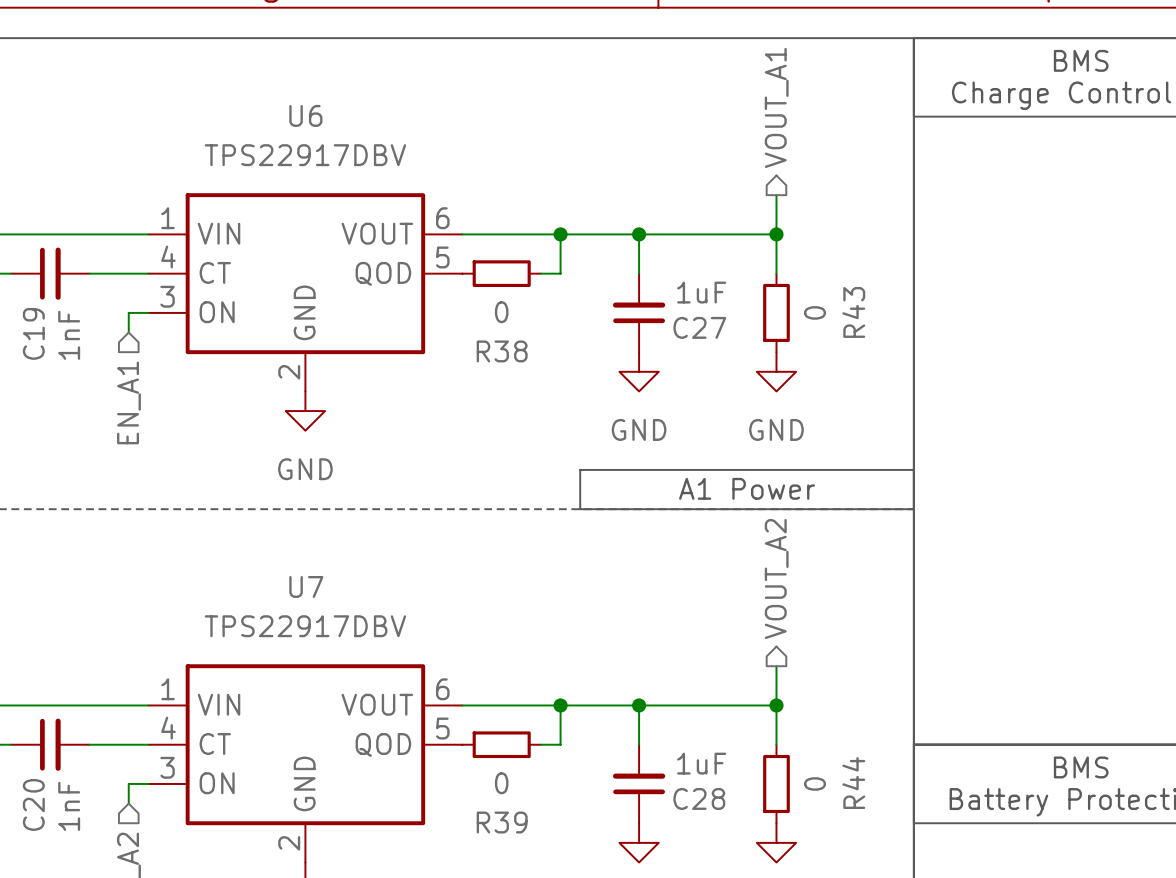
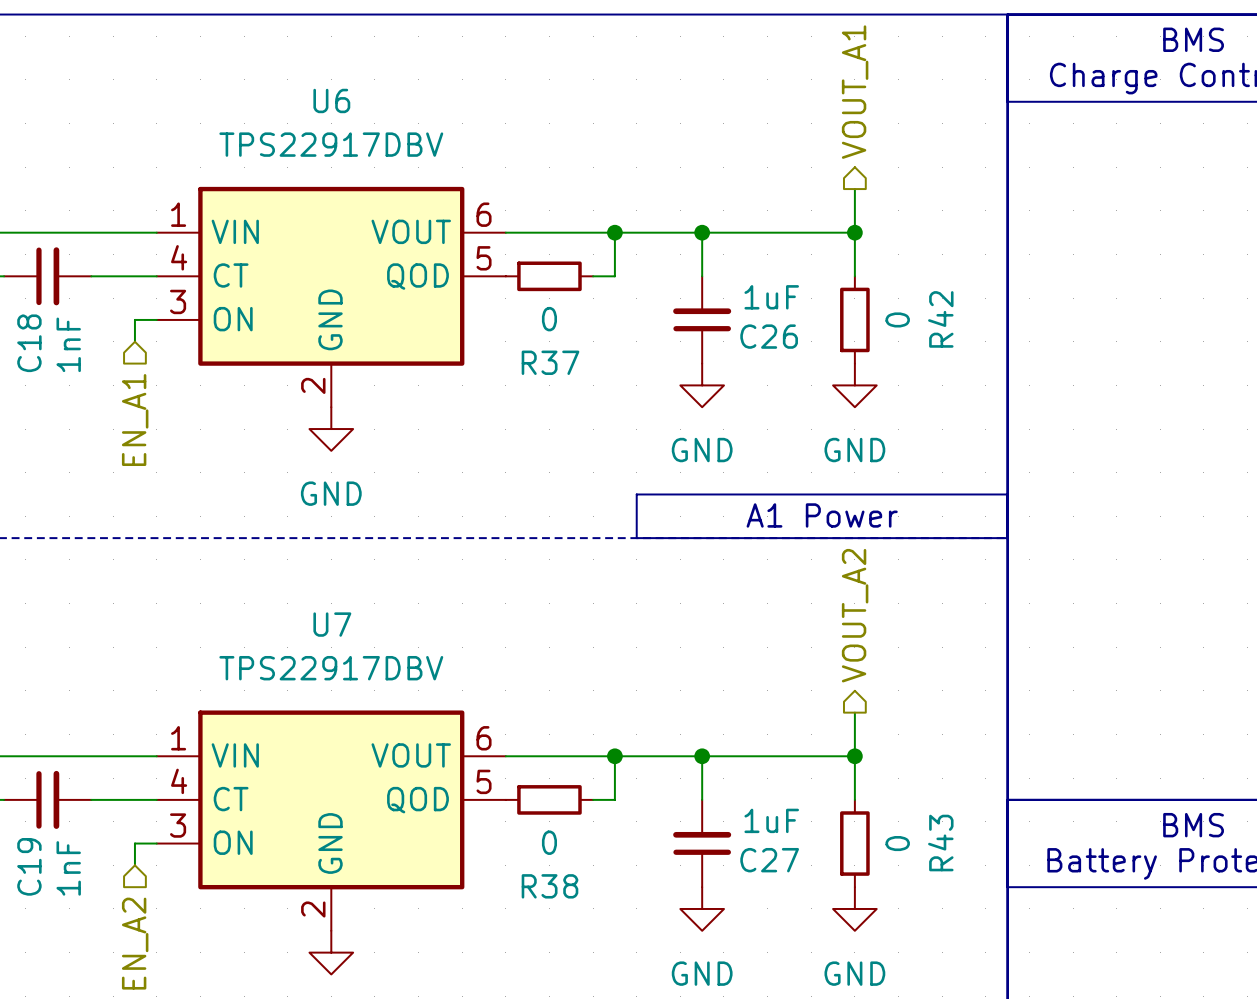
R43 name: R43 (853, 312) -> R42 (940, 319)
C27 name: C27 (699, 327) -> C26 (769, 336)
C19 name: C19 (33, 333) -> C18 (29, 343)
R38 name: R38 (502, 351) -> R37 (550, 362)
R44 name: R44 (853, 783) -> R43 (940, 843)
C28 name: C28 (699, 798) -> C27 (769, 860)
C20 name: C20 (33, 804) -> C19 (29, 866)
R39 name: R39 (502, 822) -> R38 (549, 886)

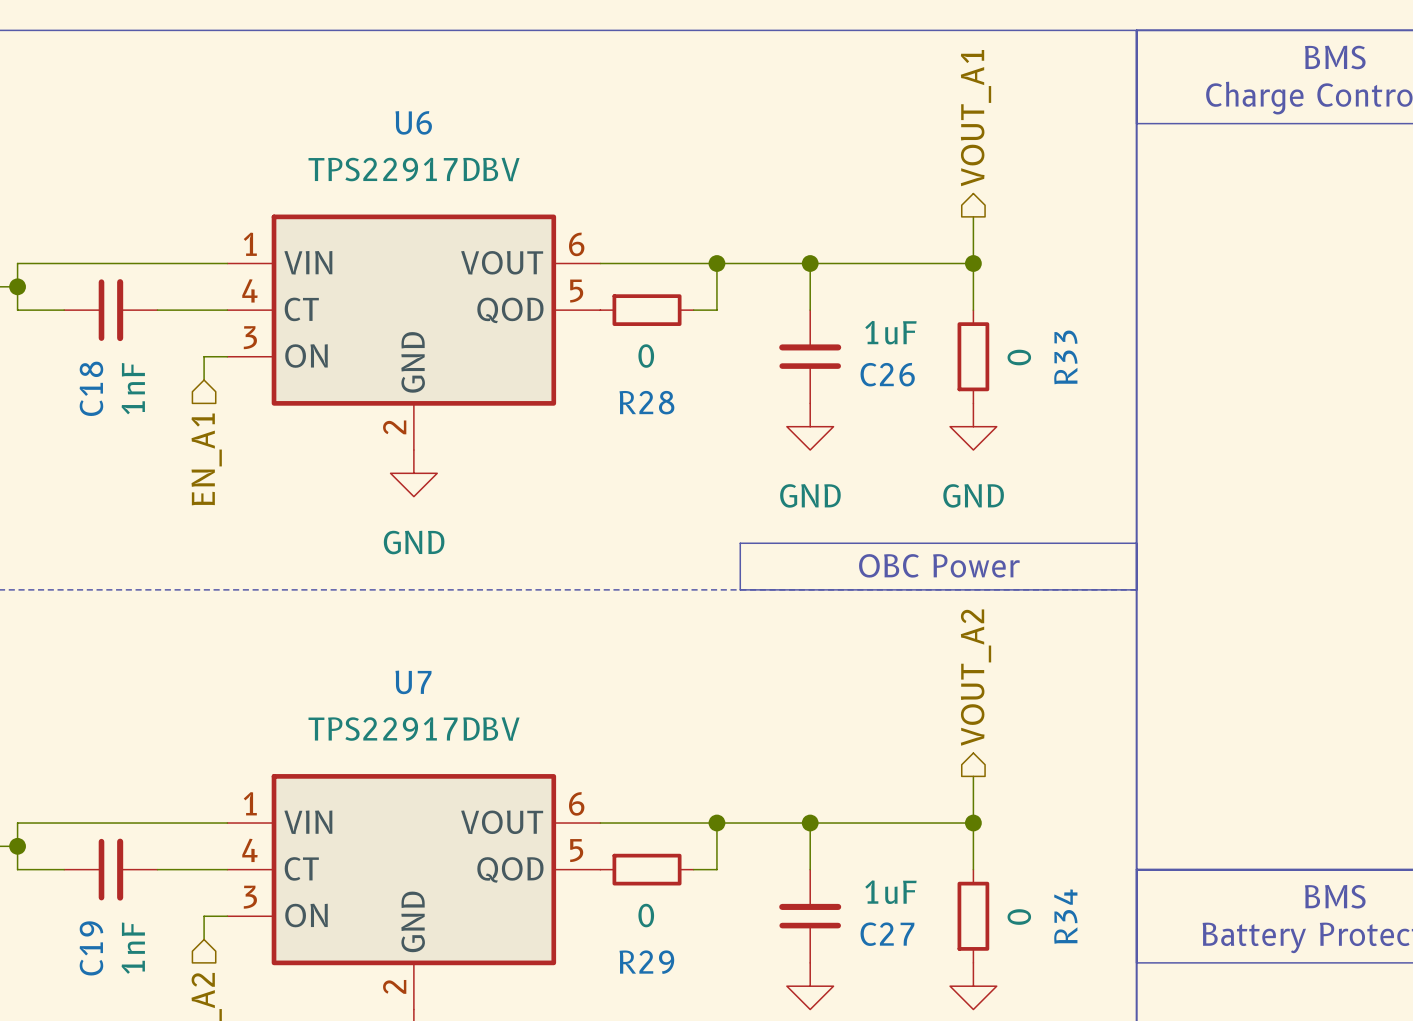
R42 name: R42 (940, 319) -> R33 (1065, 357)
R37 name: R37 (550, 362) -> R28 (646, 402)
text: A1 Power (822, 515) -> OBC Power (939, 565)
R43 name: R43 (940, 843) -> R34 (1065, 916)
R38 name: R38 (549, 886) -> R29 (646, 962)

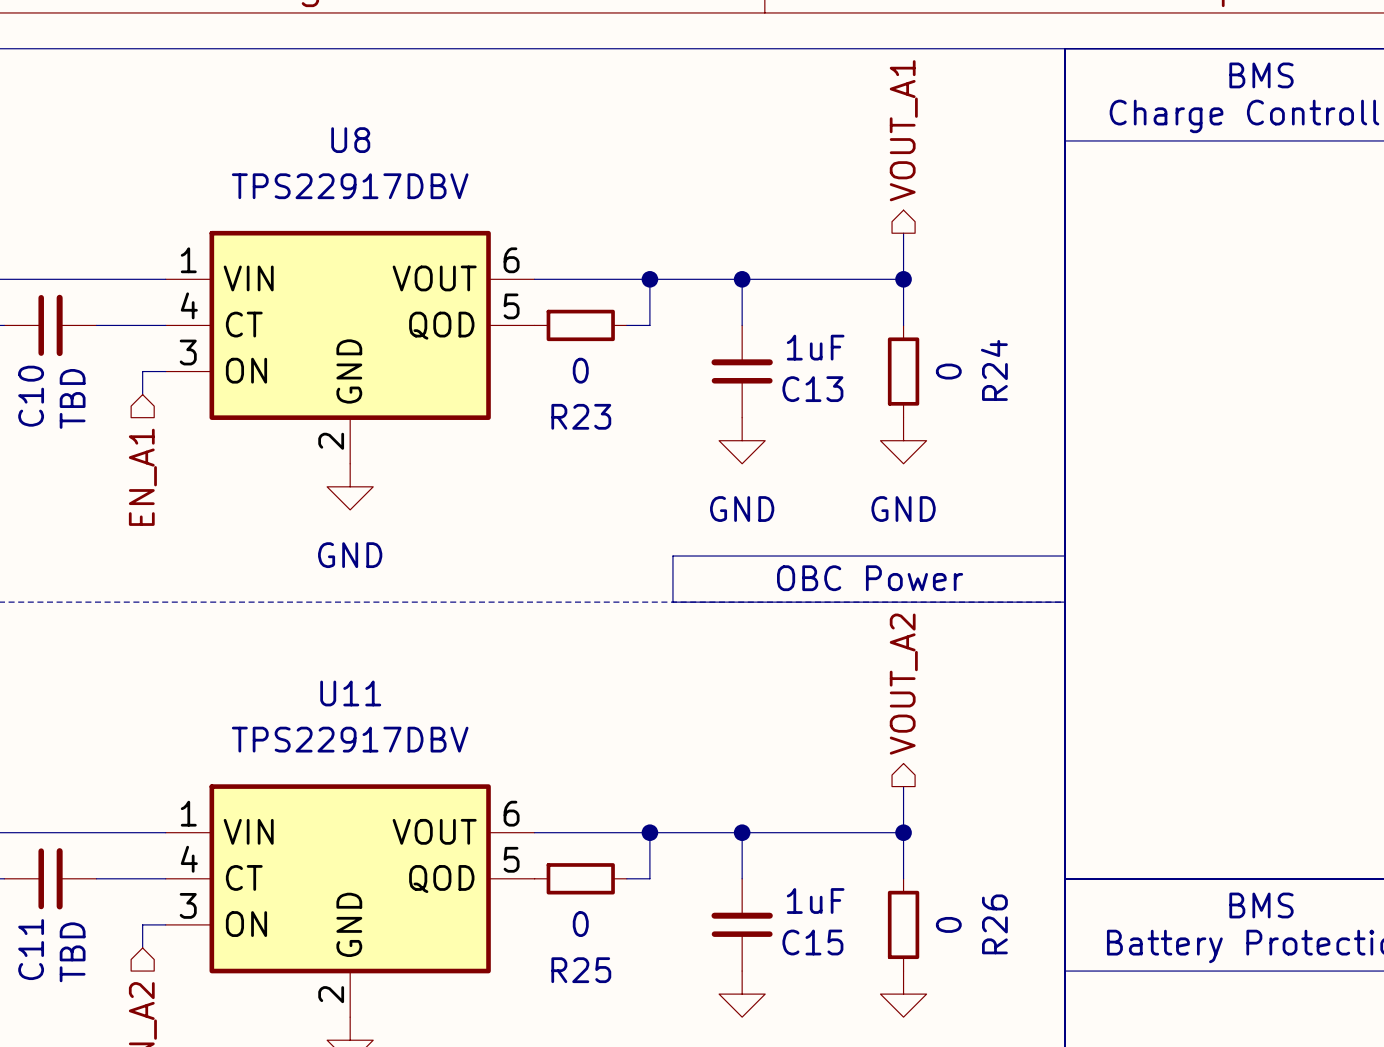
U6 name: U6 (413, 122) -> U8 (350, 140)
R33 name: R33 (1065, 357) -> R24 (994, 370)
C26 name: C26 (887, 374) -> C13 (812, 389)
C18 name: C18 (91, 388) -> C10 (31, 396)
C18 value: 1nF (133, 388) -> TBD (72, 398)
R28 name: R28 (646, 402) -> R23 (581, 416)
U7 name: U7 (413, 682) -> U11 (350, 693)
R34 name: R34 (1065, 916) -> R26 (994, 924)
C27 name: C27 (887, 934) -> C15 (812, 942)
C19 name: C19 (91, 948) -> C11 (31, 949)
C19 value: 1nF (133, 948) -> TBD (72, 952)
R29 name: R29 (646, 962) -> R25 (581, 970)

